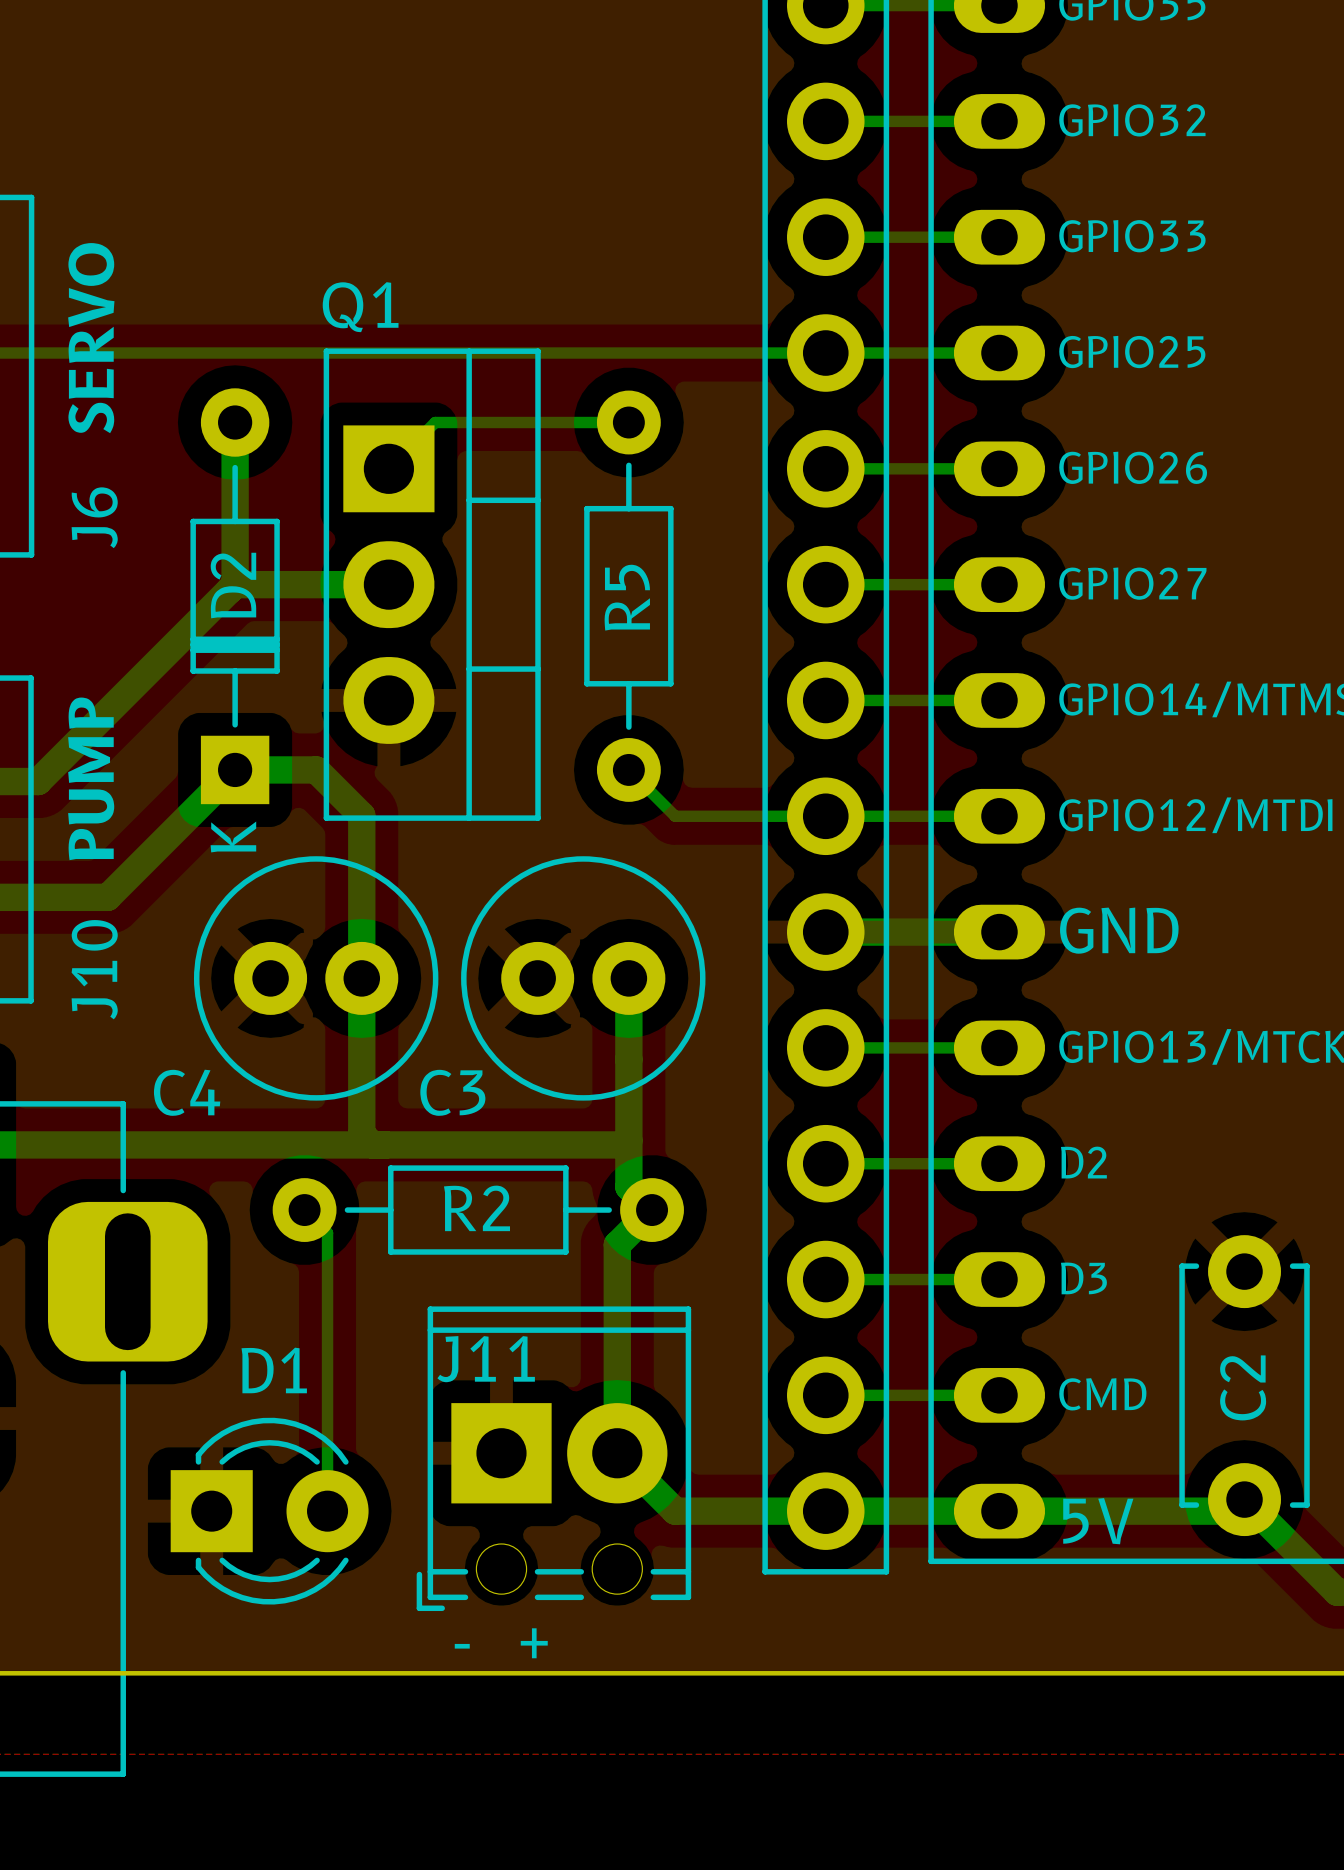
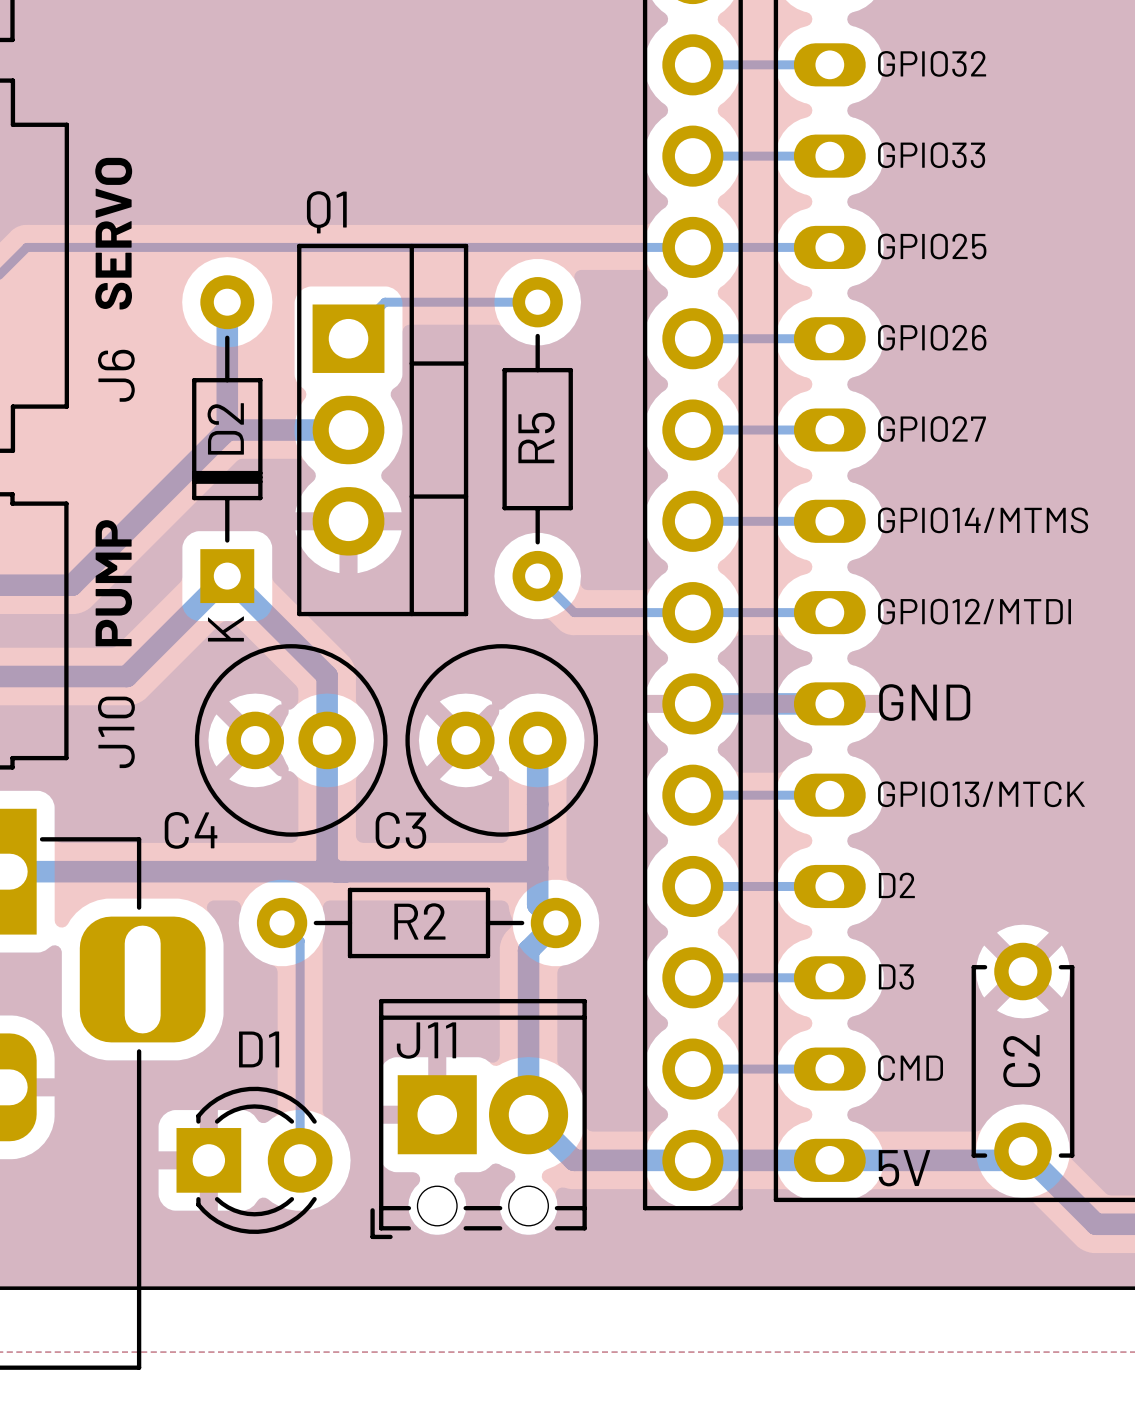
bottom track: (235, 769) (316, 769) (361, 815) (361, 896) -> (227, 576) (327, 675)
text: - + (501, 1643) -> none

